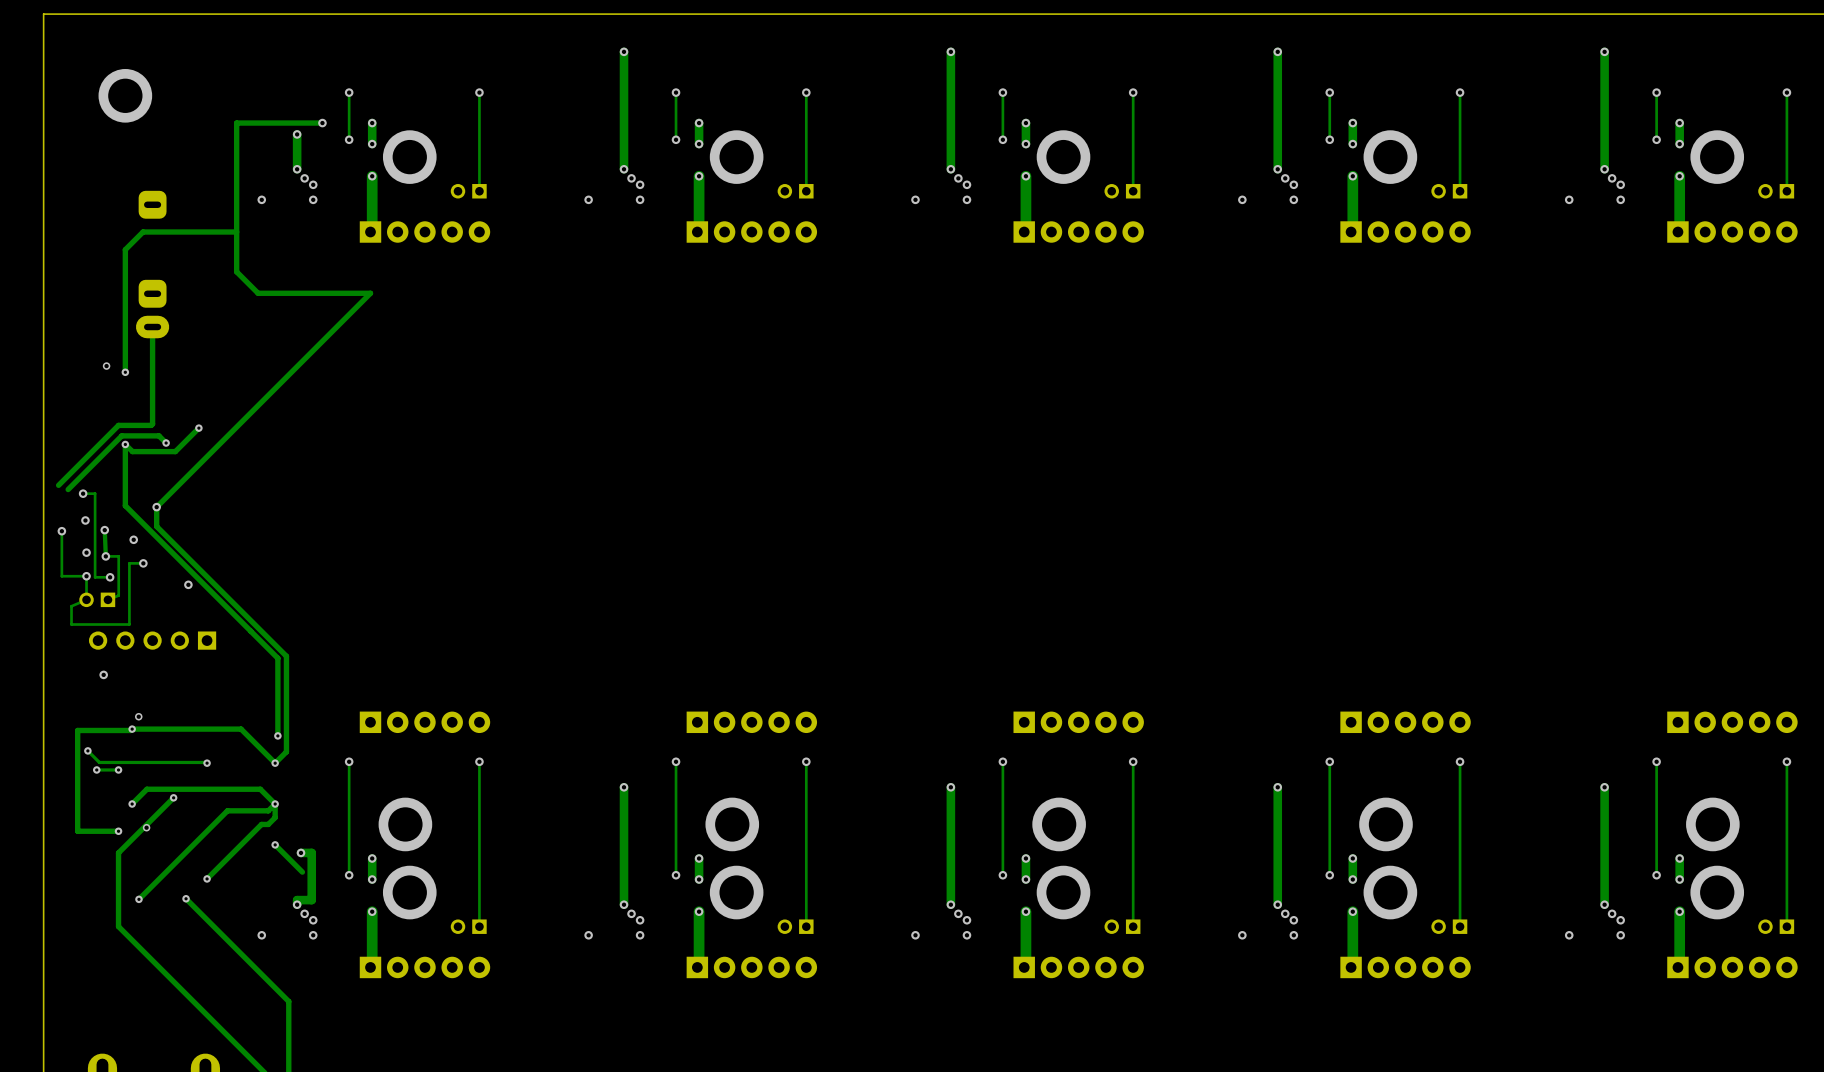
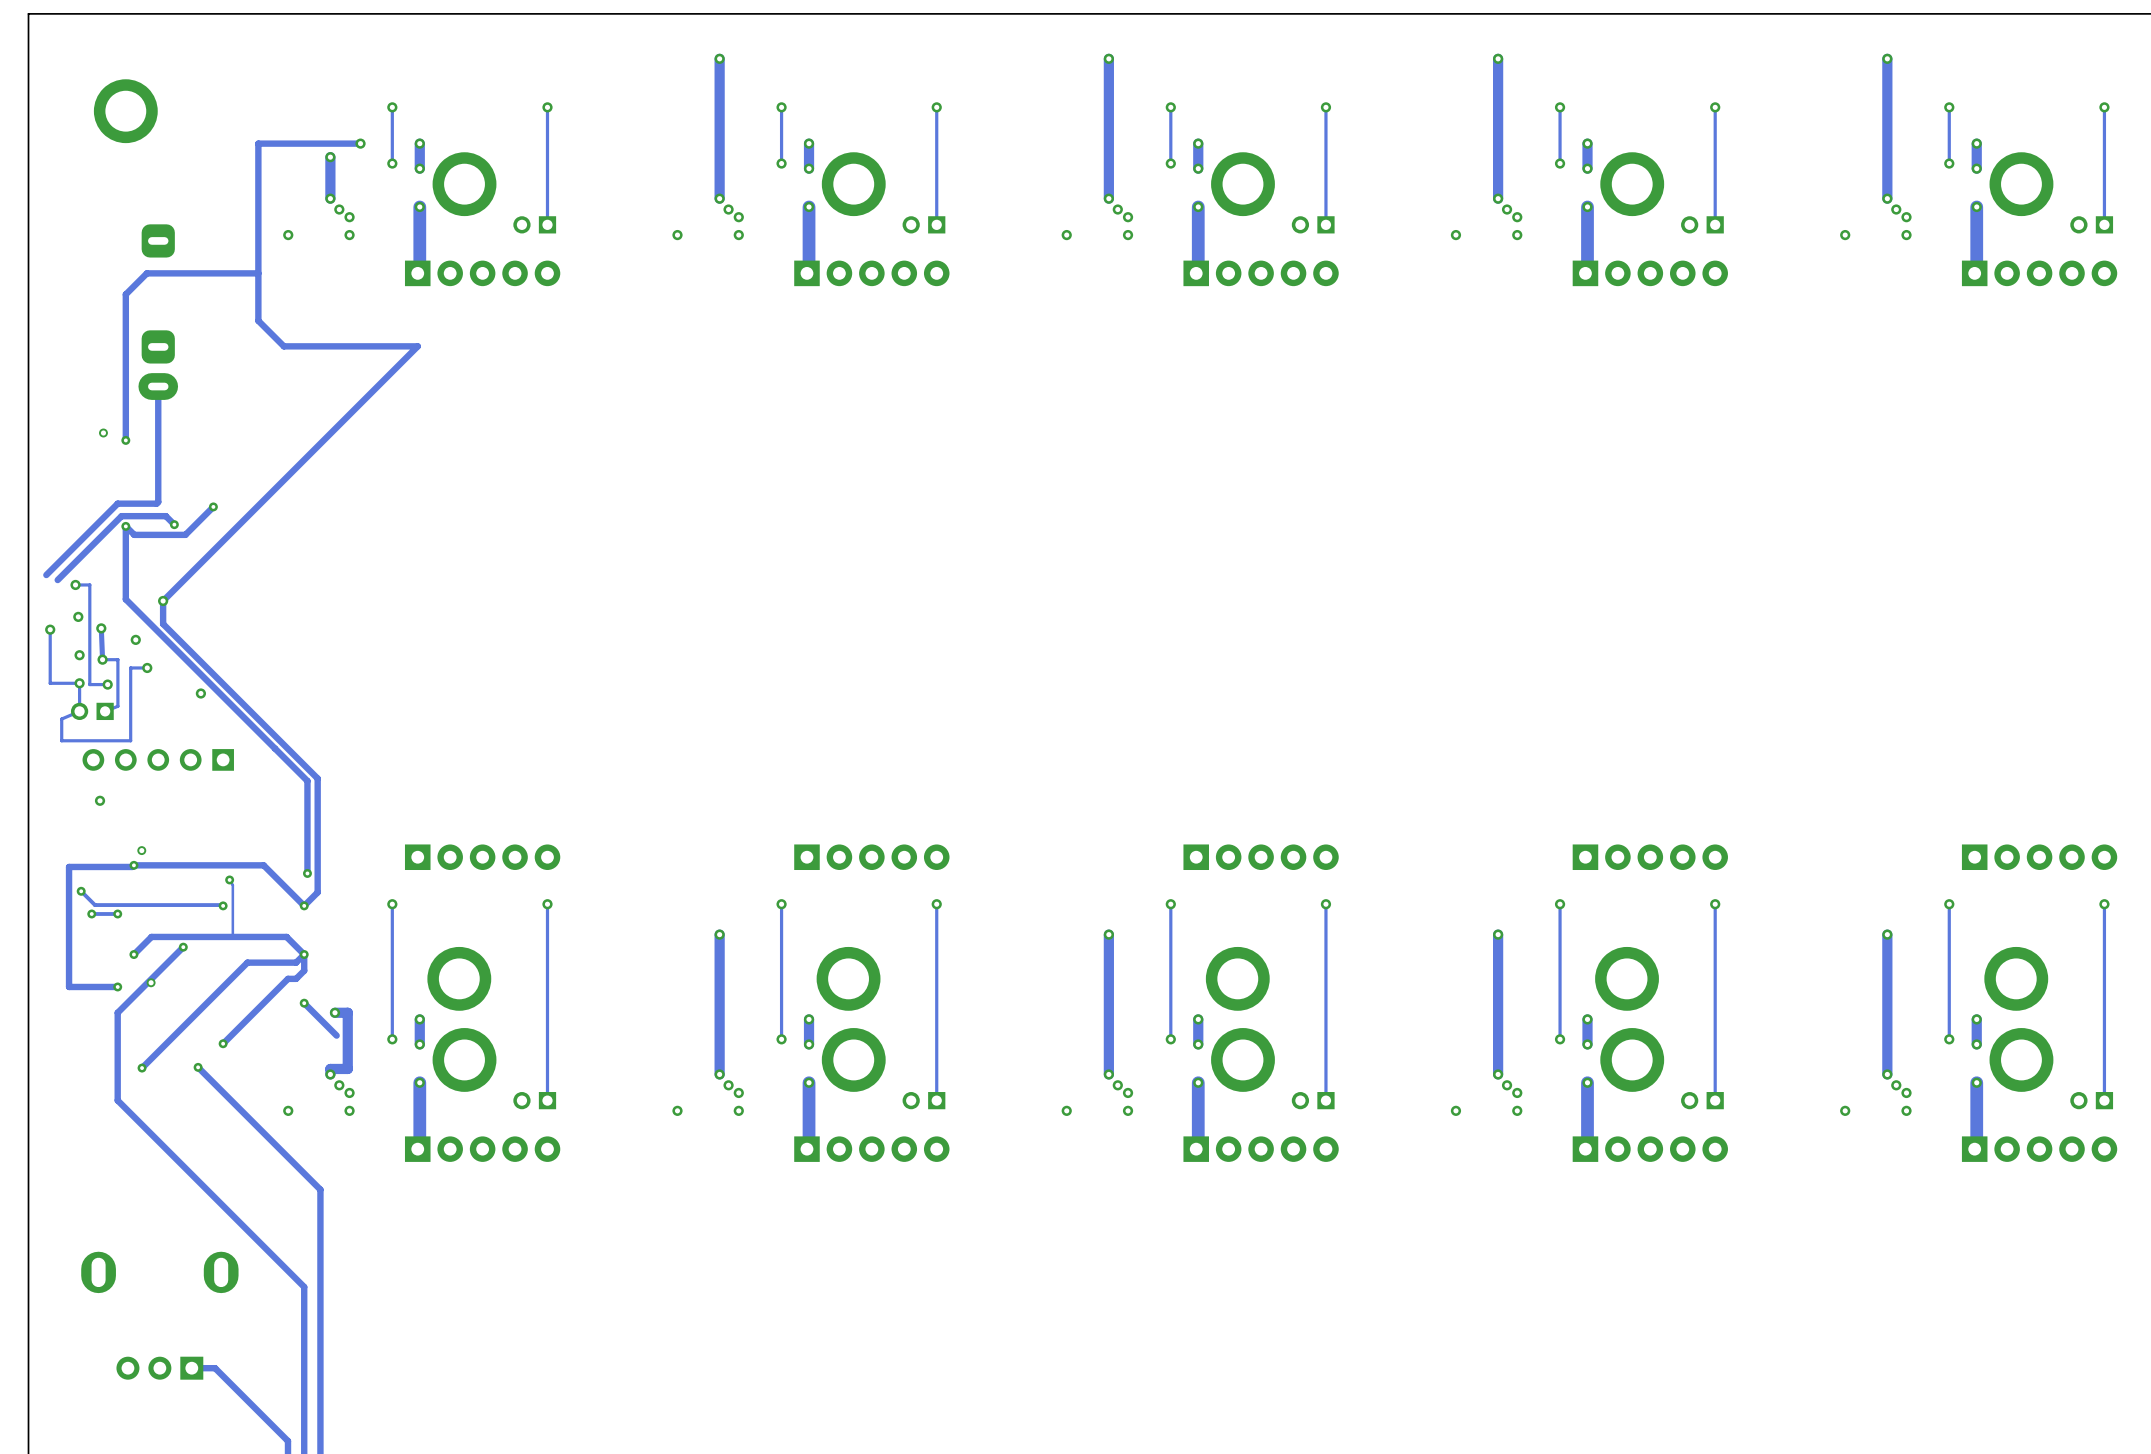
track: none -> (229, 879) (232, 885) (232, 936)
via: none -> (229, 879)

